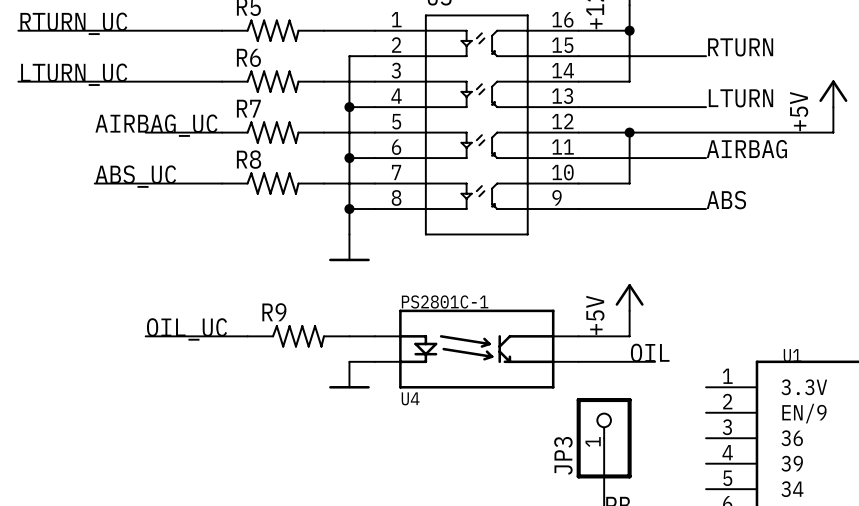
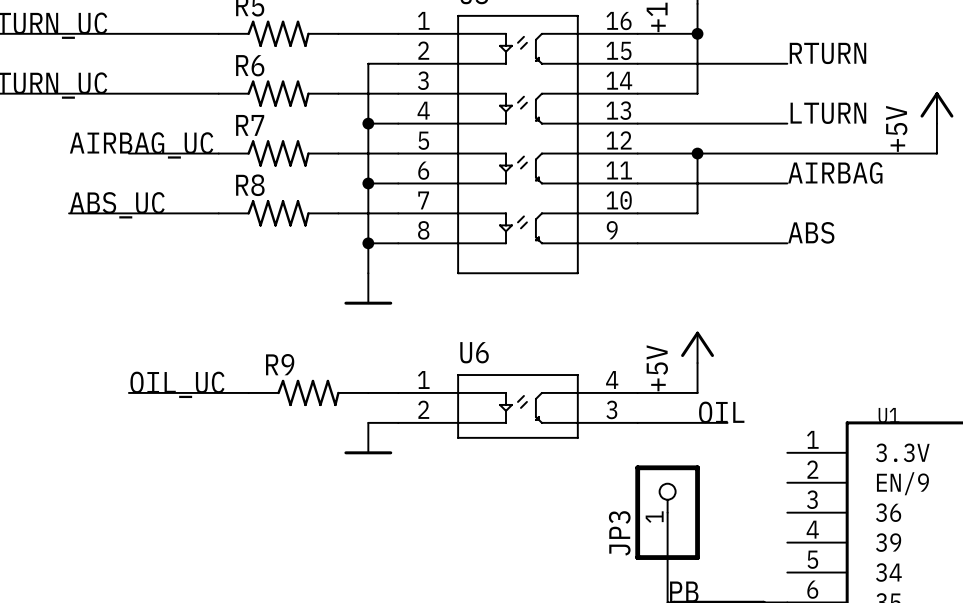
U6: none -> (517, 406)
U4: PS2801C-1 (476, 349) -> none

